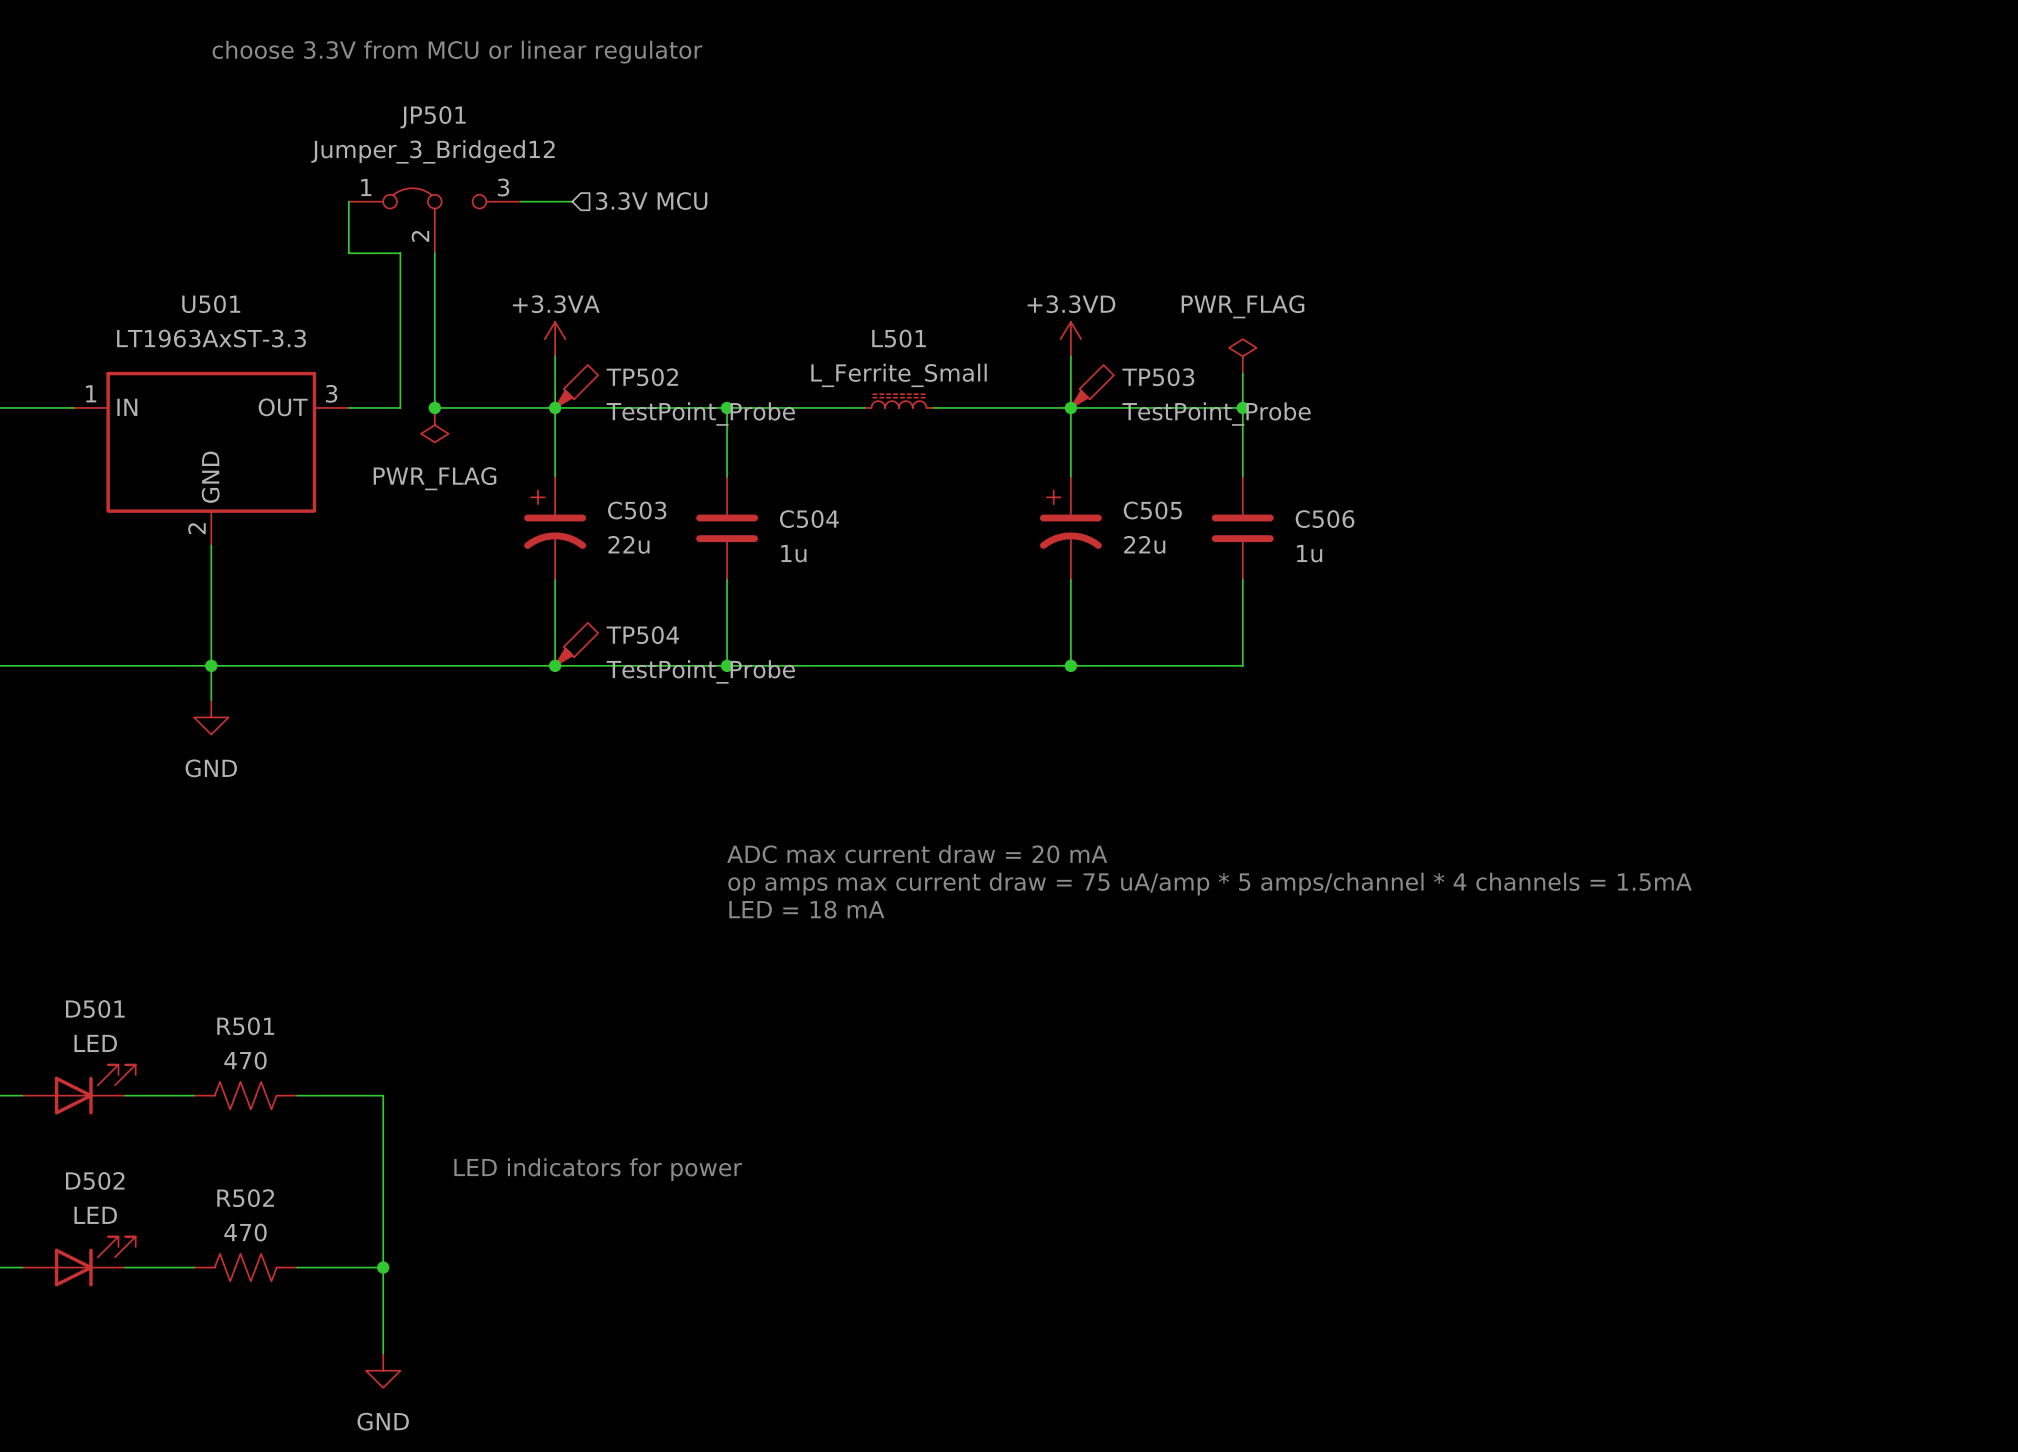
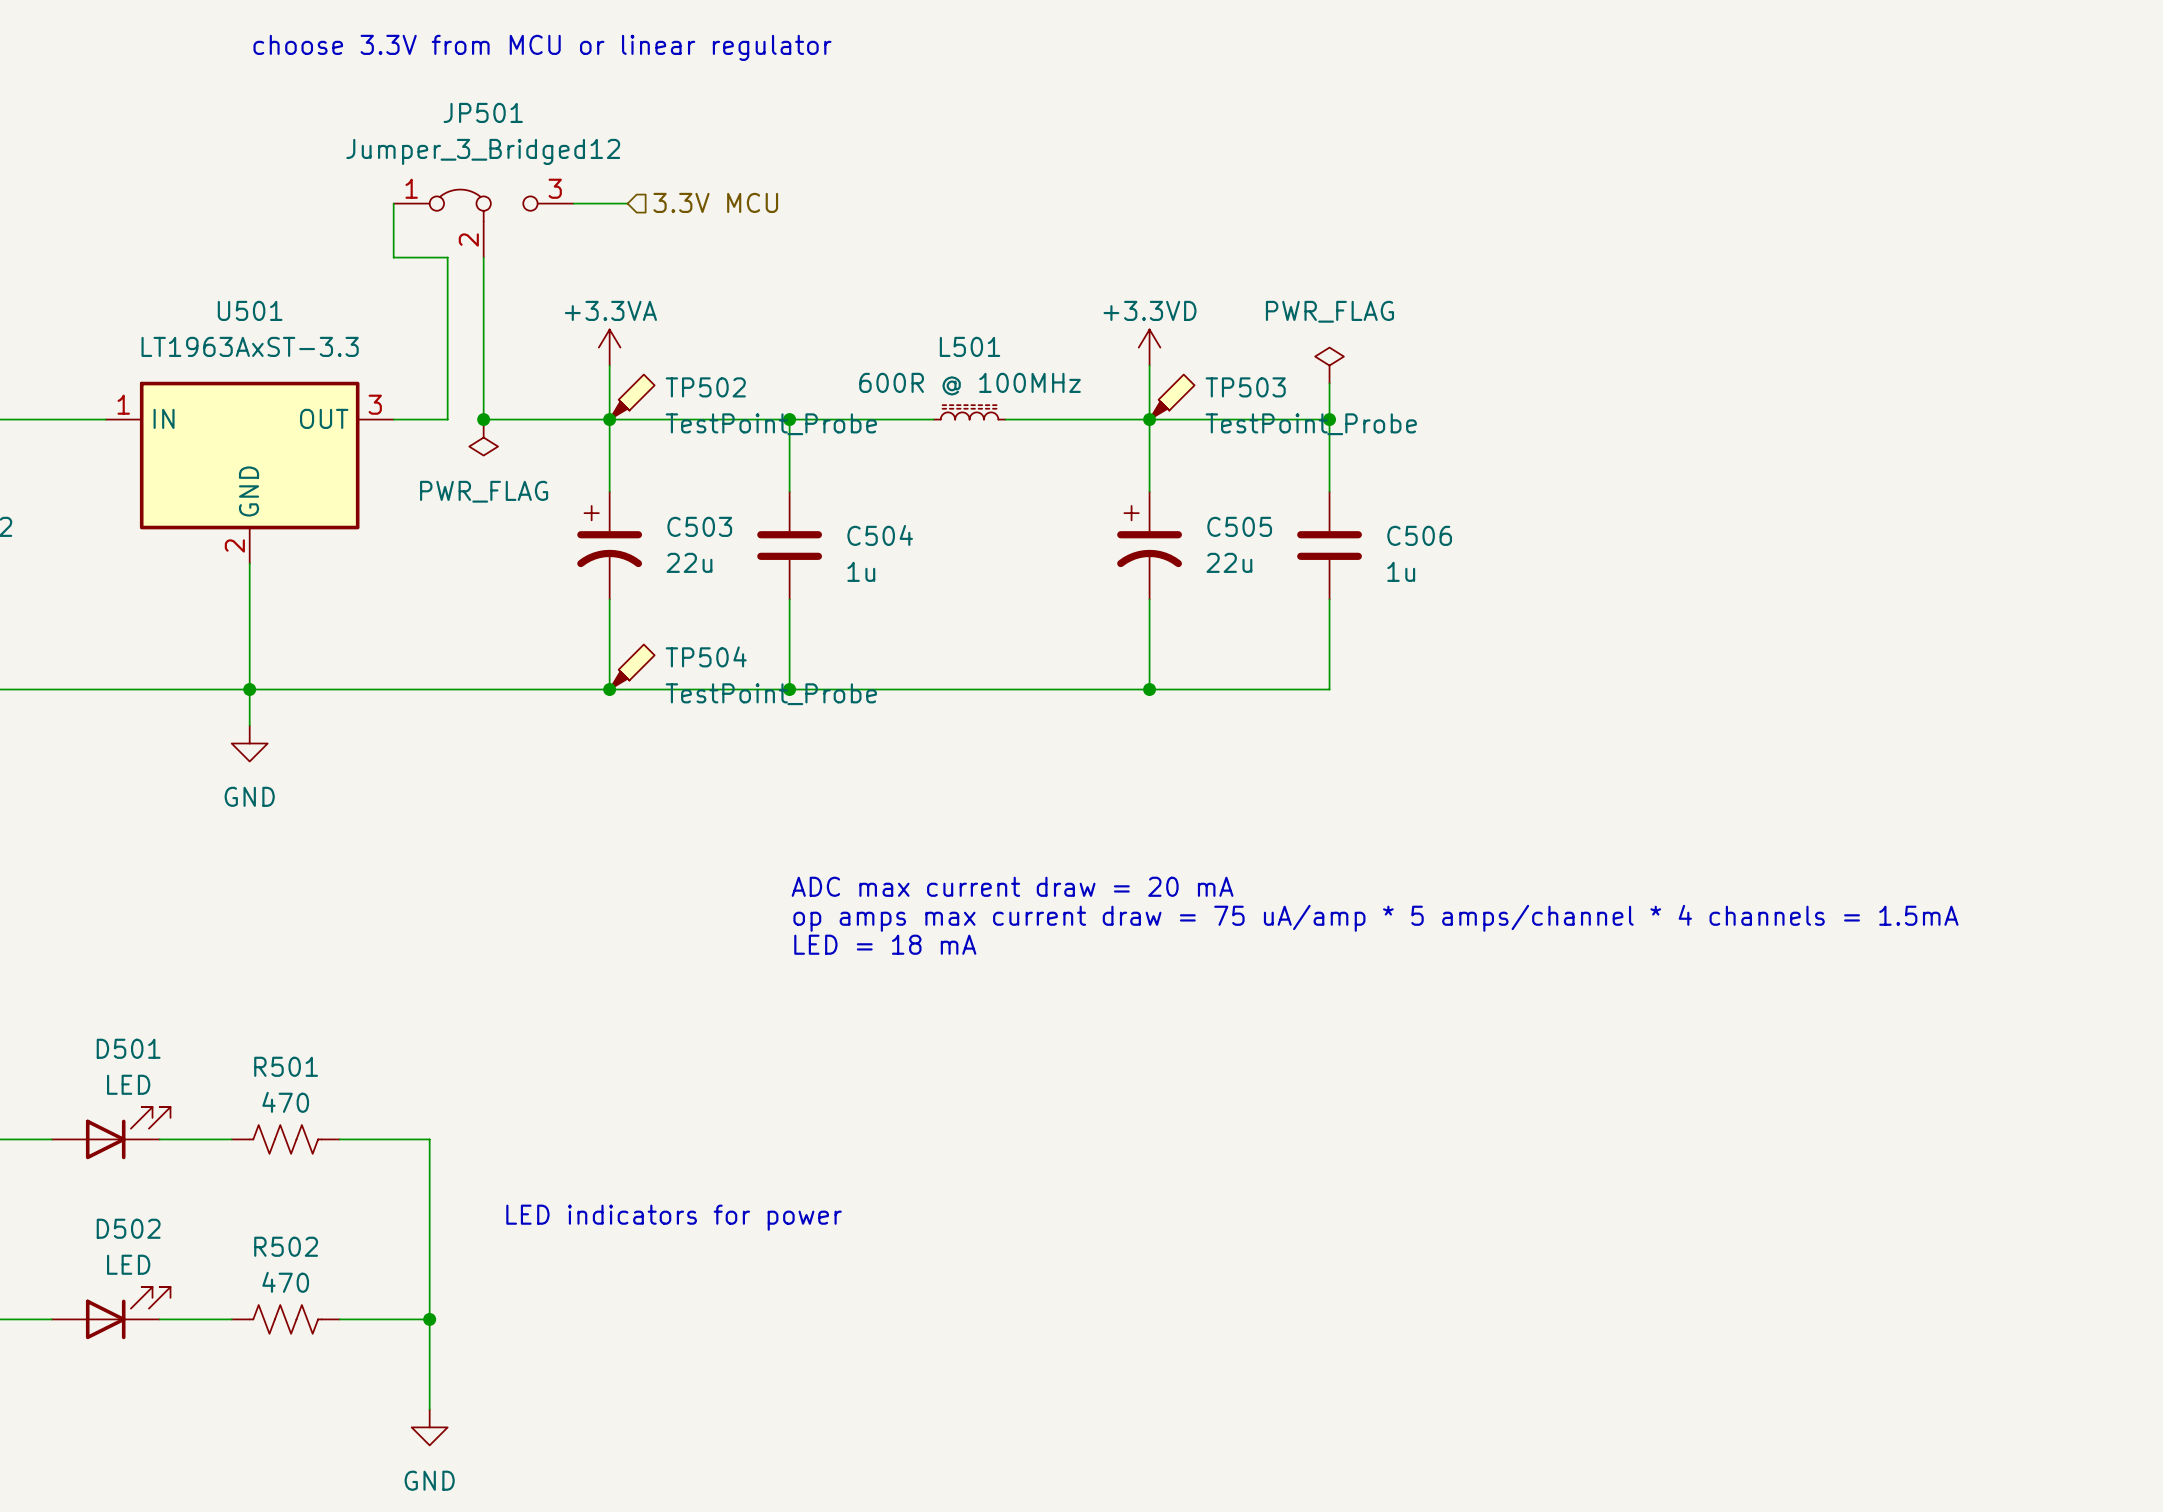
L501 value: L_Ferrite_Small (899, 375) -> 600R @ 100MHz (970, 384)

